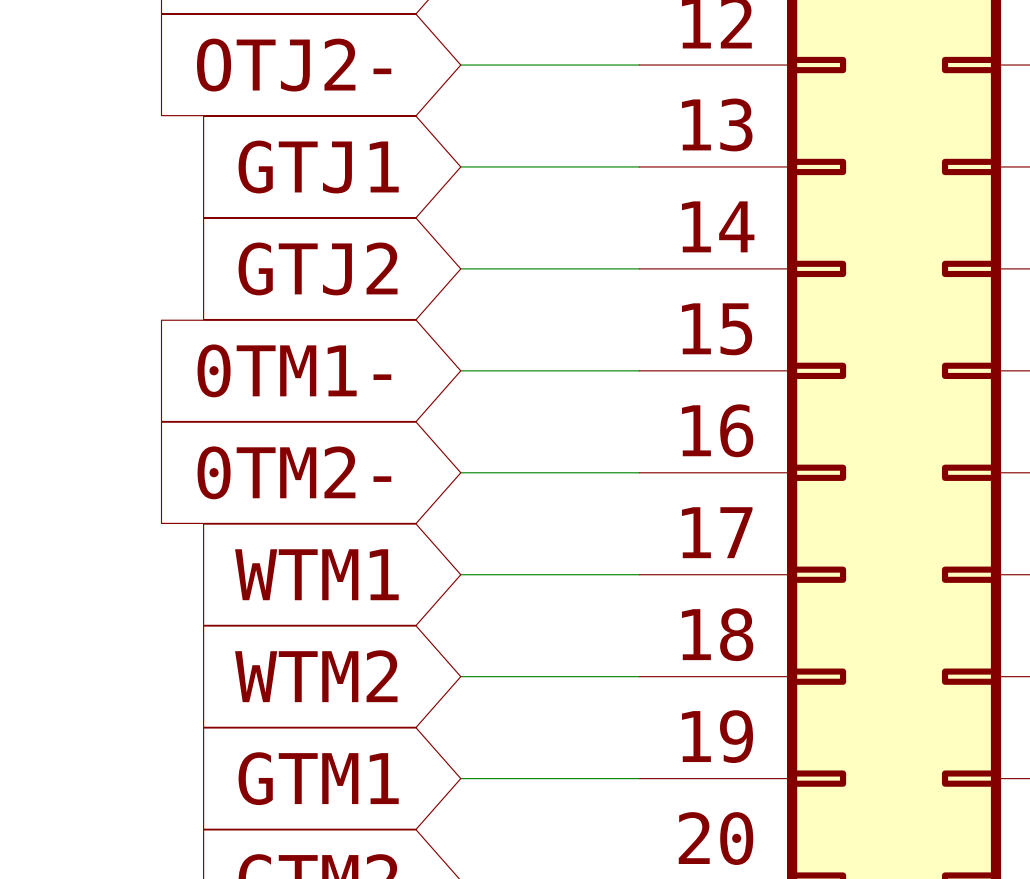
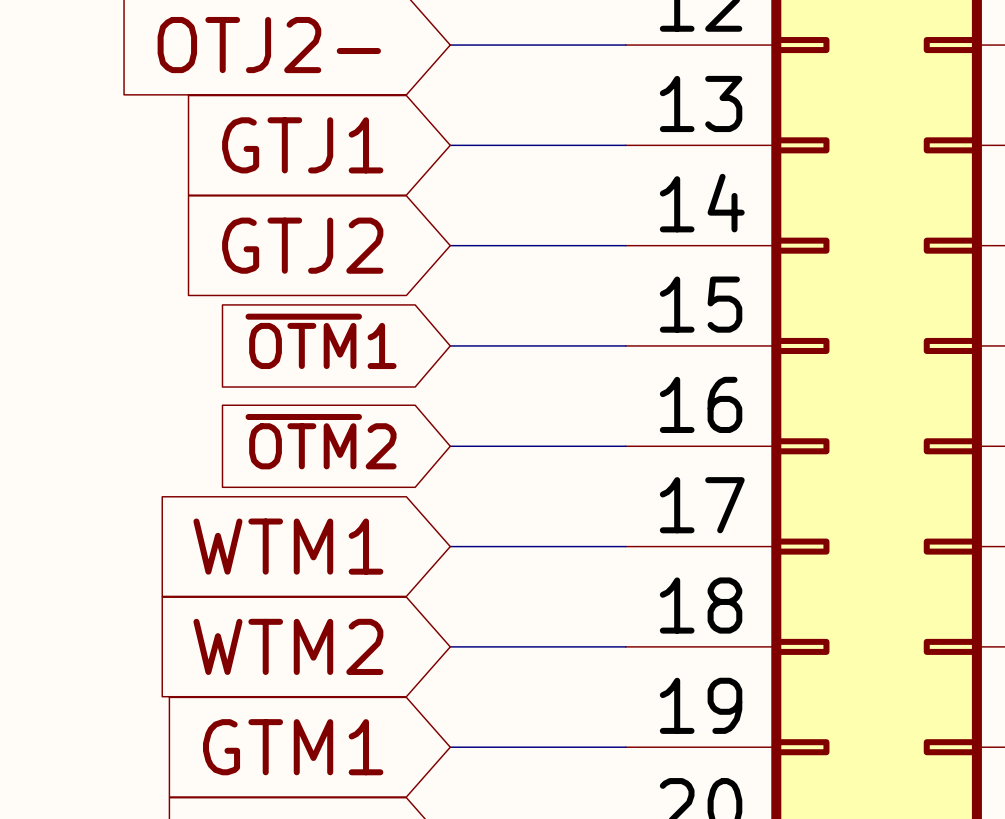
global label: 0TM1- (294, 370) -> ~{OTM}1 (321, 341)
global label: 0TM2- (294, 472) -> ~{OTM}2 (321, 441)

